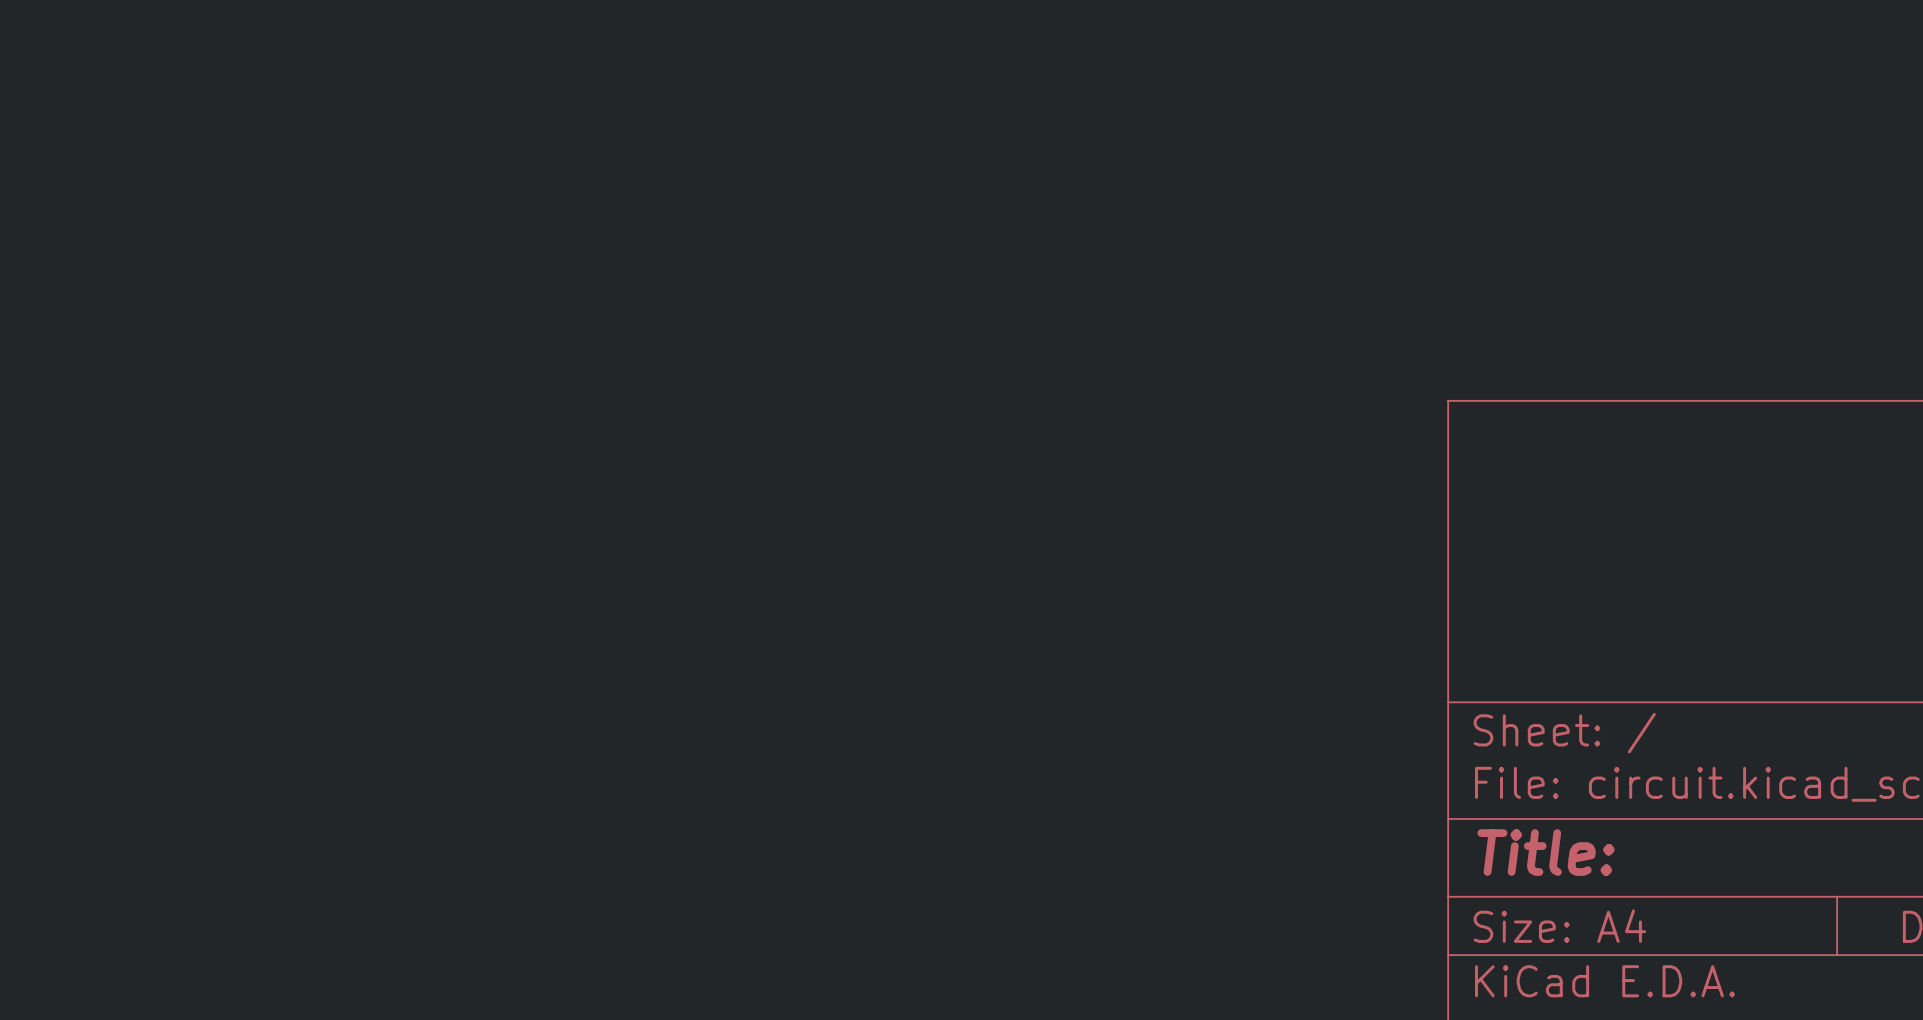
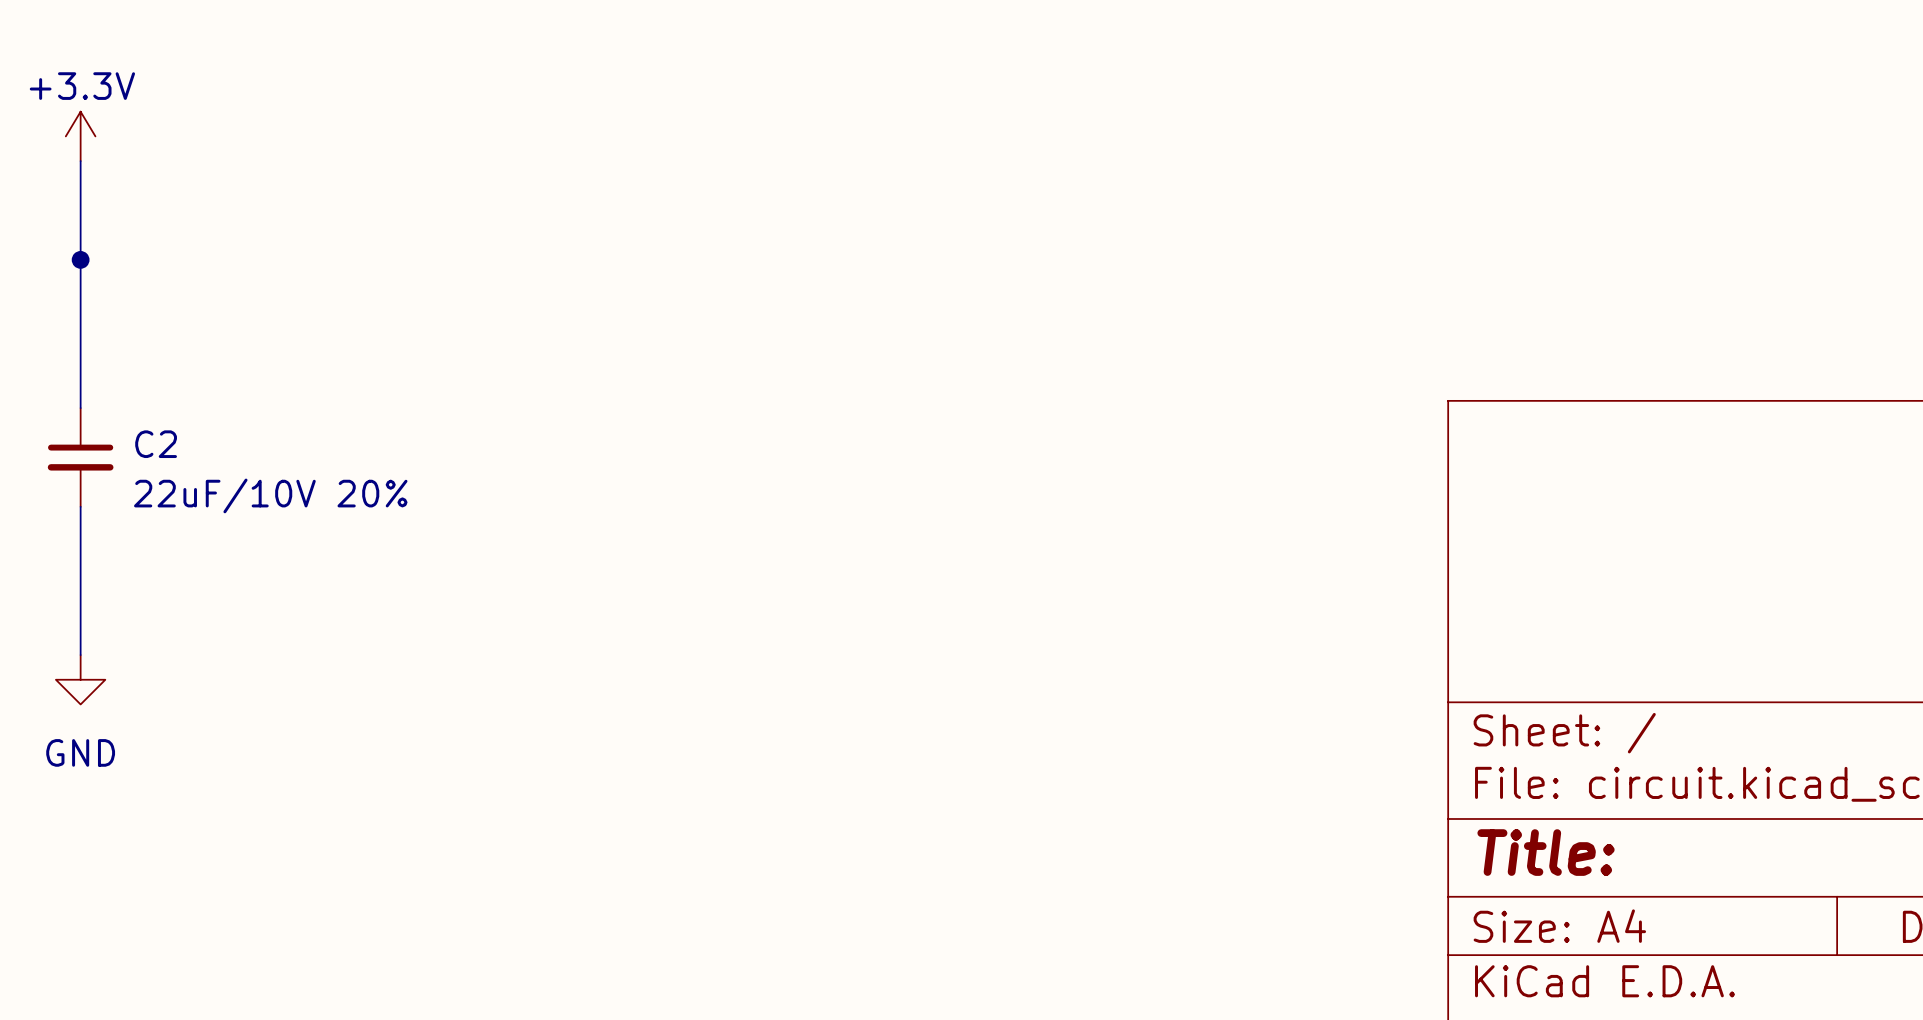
power symbol: none -> +3.3V (80, 136)
wire: none -> (80, 161) (80, 408)
junction: none -> (80, 259)
C2: none -> 22uF/10V 20% (80, 457)
wire: none -> (80, 506) (80, 655)
power symbol: none -> GND (80, 679)

